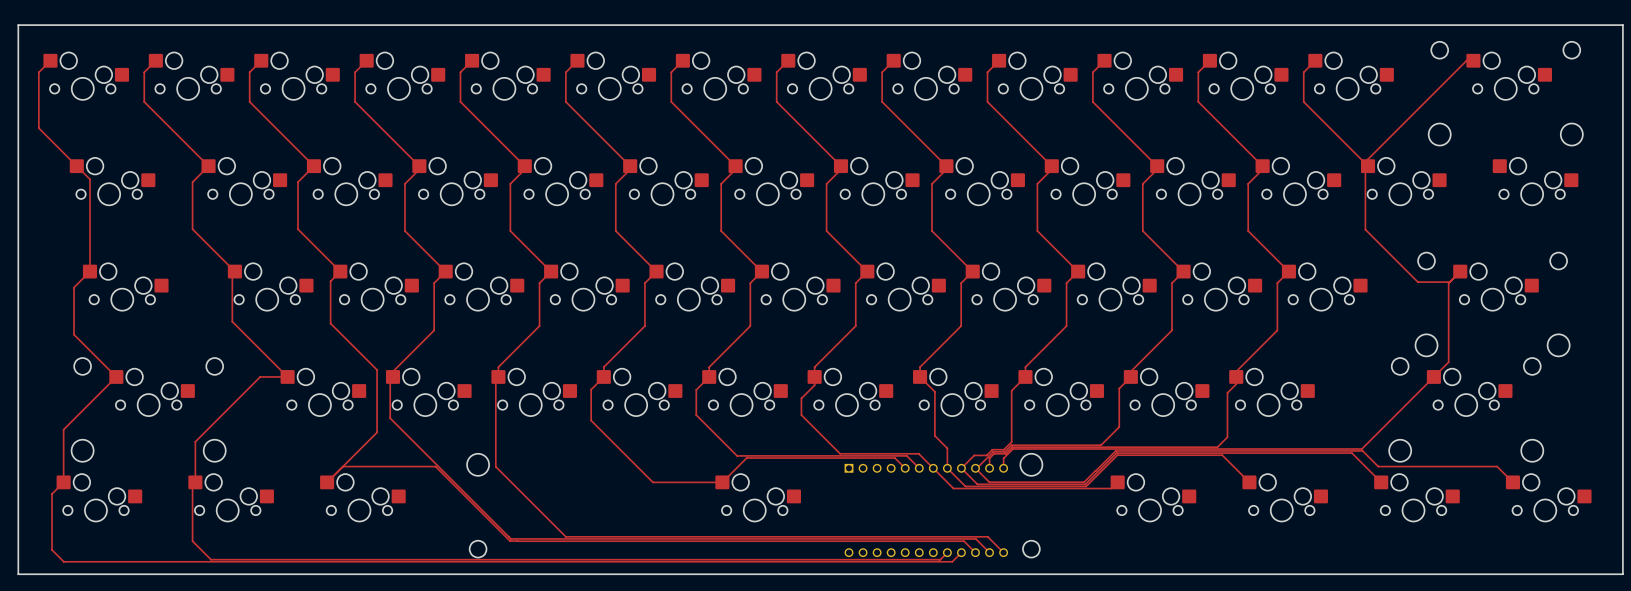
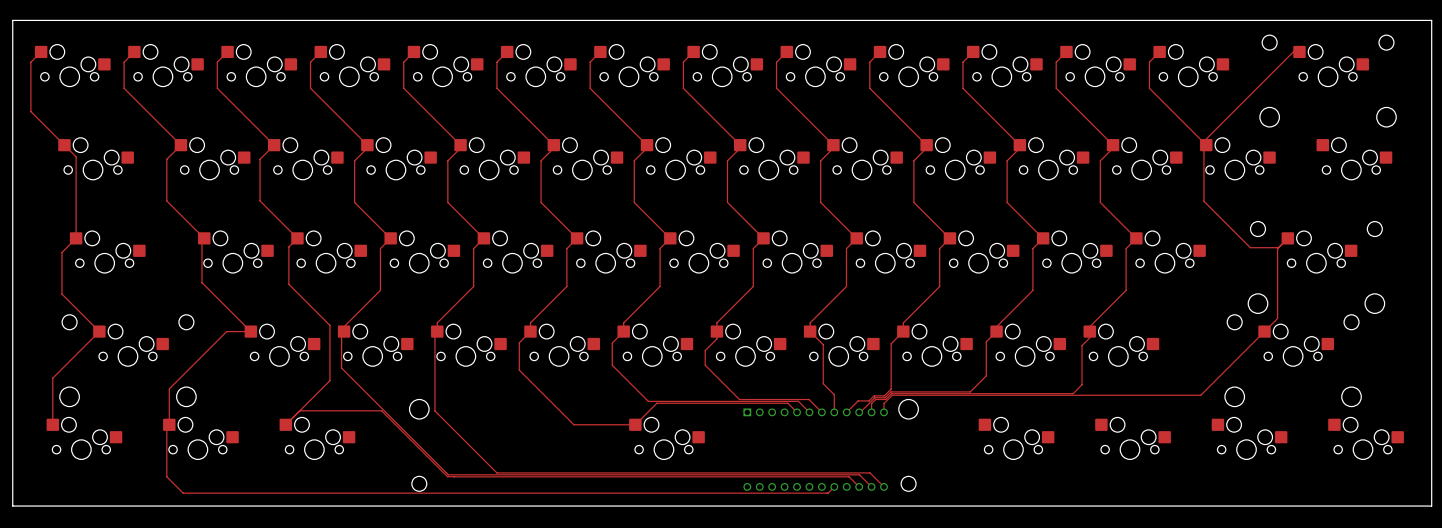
track: (933, 468) (953, 488) (1111, 488) (1117, 482) -> none
track: (947, 468) (965, 486) (1086, 486) (1117, 455) (1222, 455) (1249, 482) -> none
track: (961, 468) (977, 484) (1085, 484) (1116, 453) (1351, 453) (1381, 482) -> none
track: (975, 468) (989, 482) (1084, 482) (1115, 450) (1362, 450) (1378, 466) (1497, 466) (1512, 482) -> none
track: (63, 482) (52, 493) (52, 550) (63, 561) (952, 561) (961, 552) -> none

